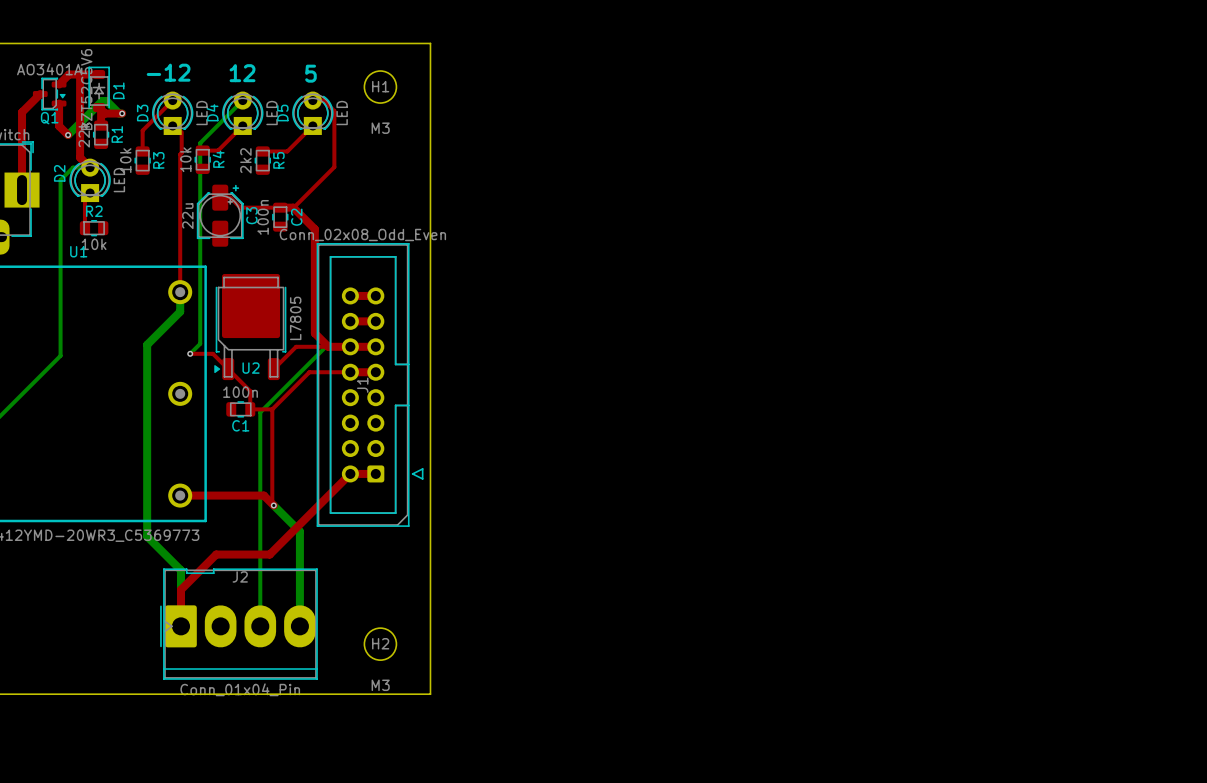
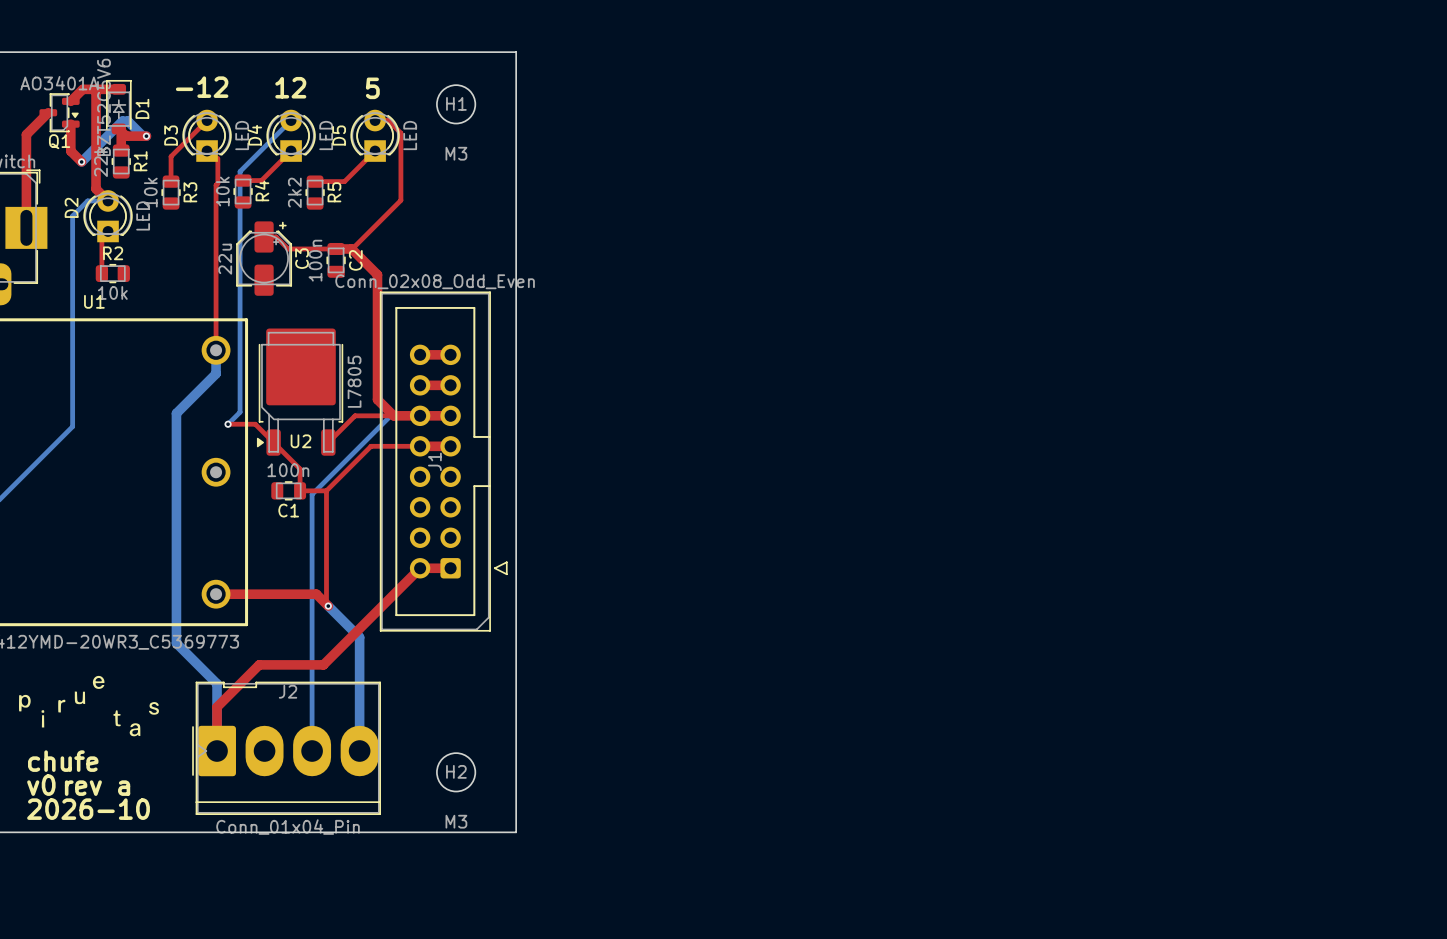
drawing: none -> [19, 675, 105, 728]
drawing: none -> [113, 702, 159, 737]
text: none -> chufe (63, 761)
text: none -> v0 (41, 785)
text: none -> rev a (97, 788)
text: none -> 2026-10 (88, 809)

